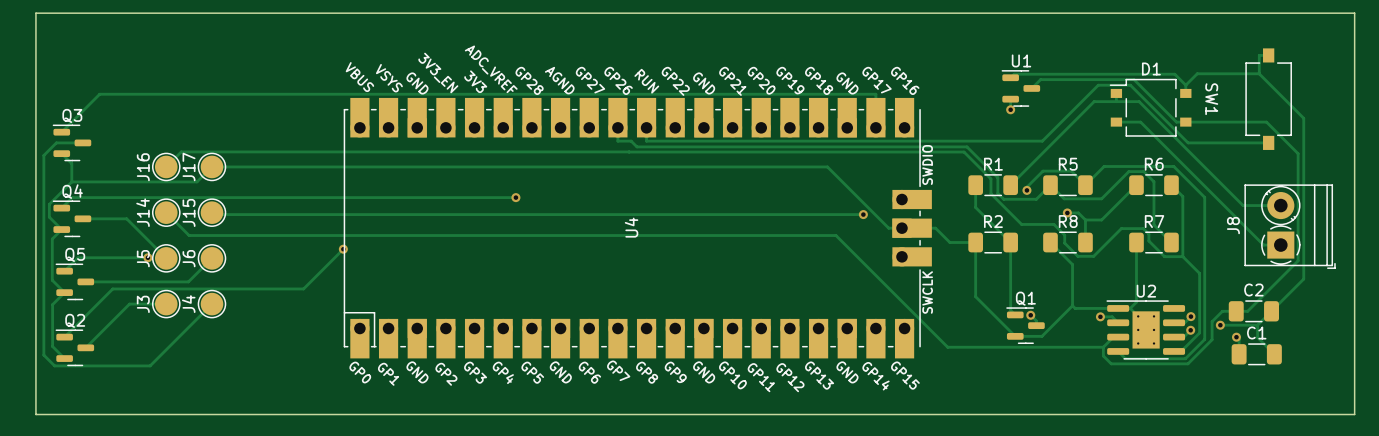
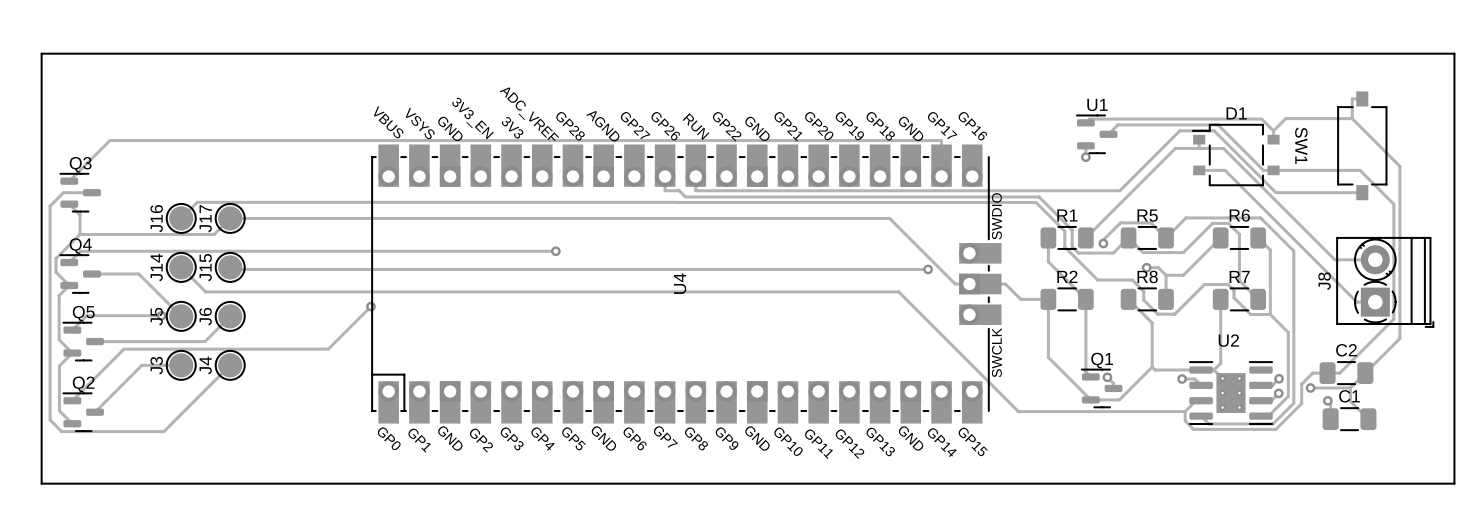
U2 footprint: [1106, 300, 1186, 360] -> [1189, 361, 1273, 425]

